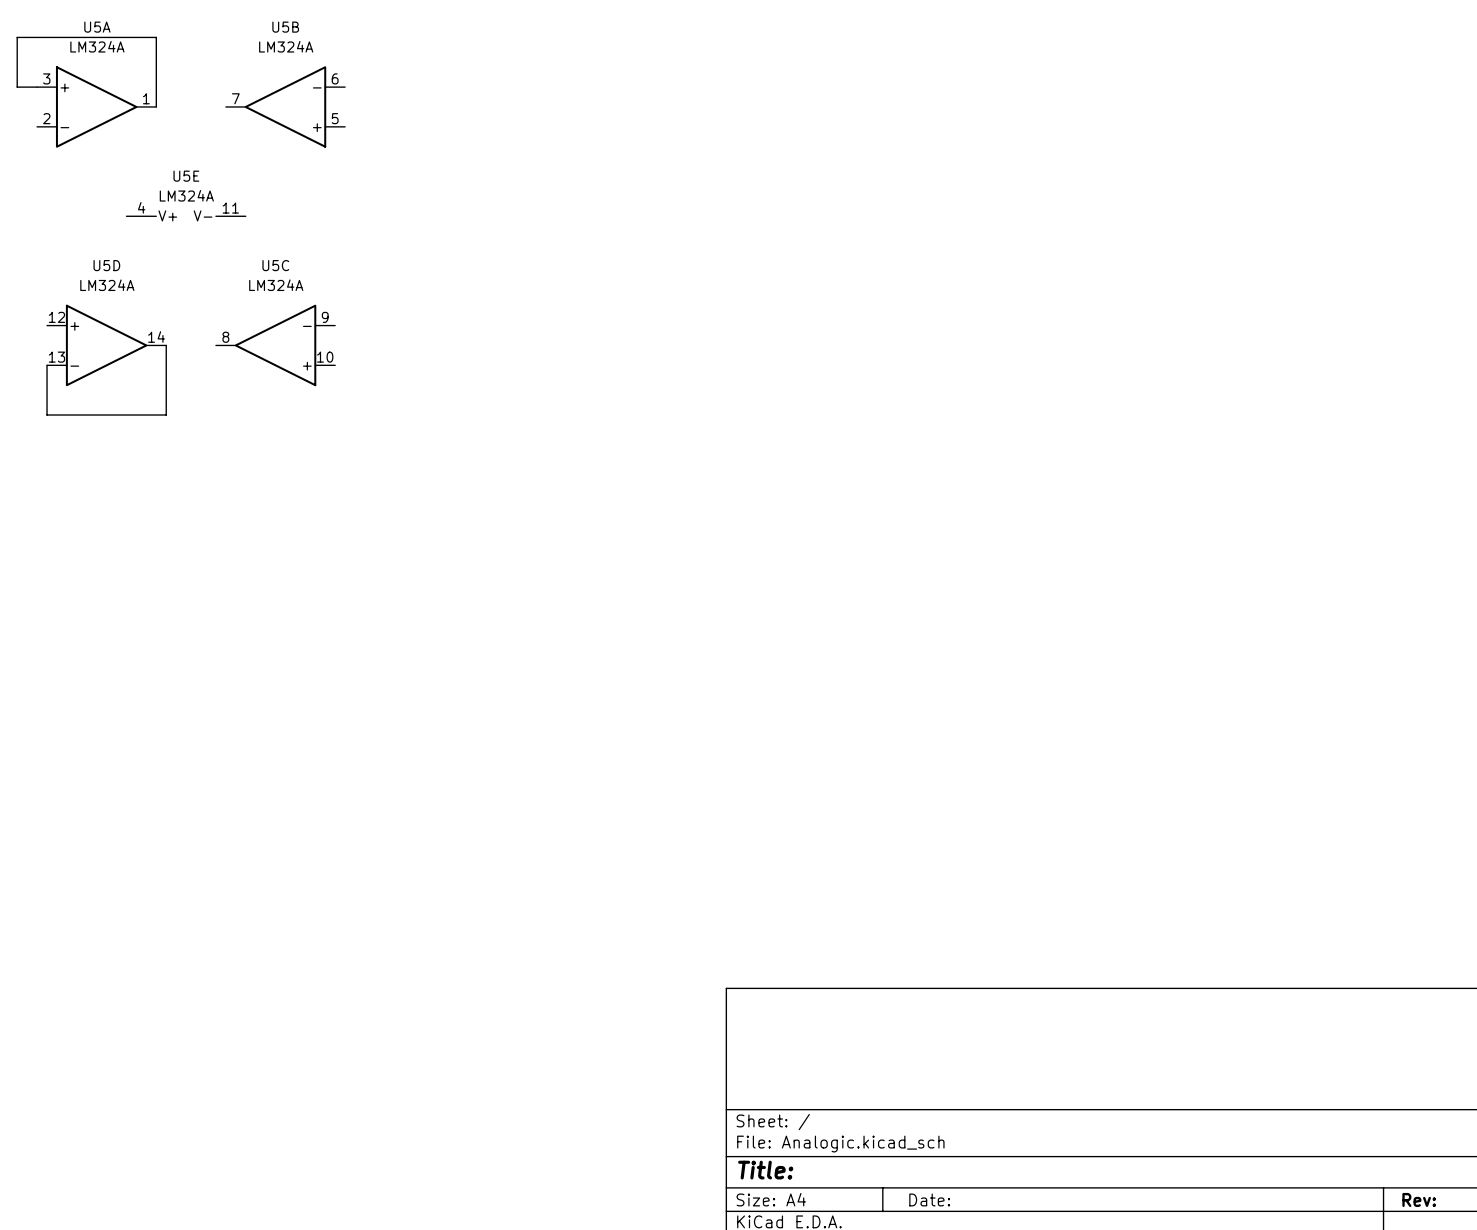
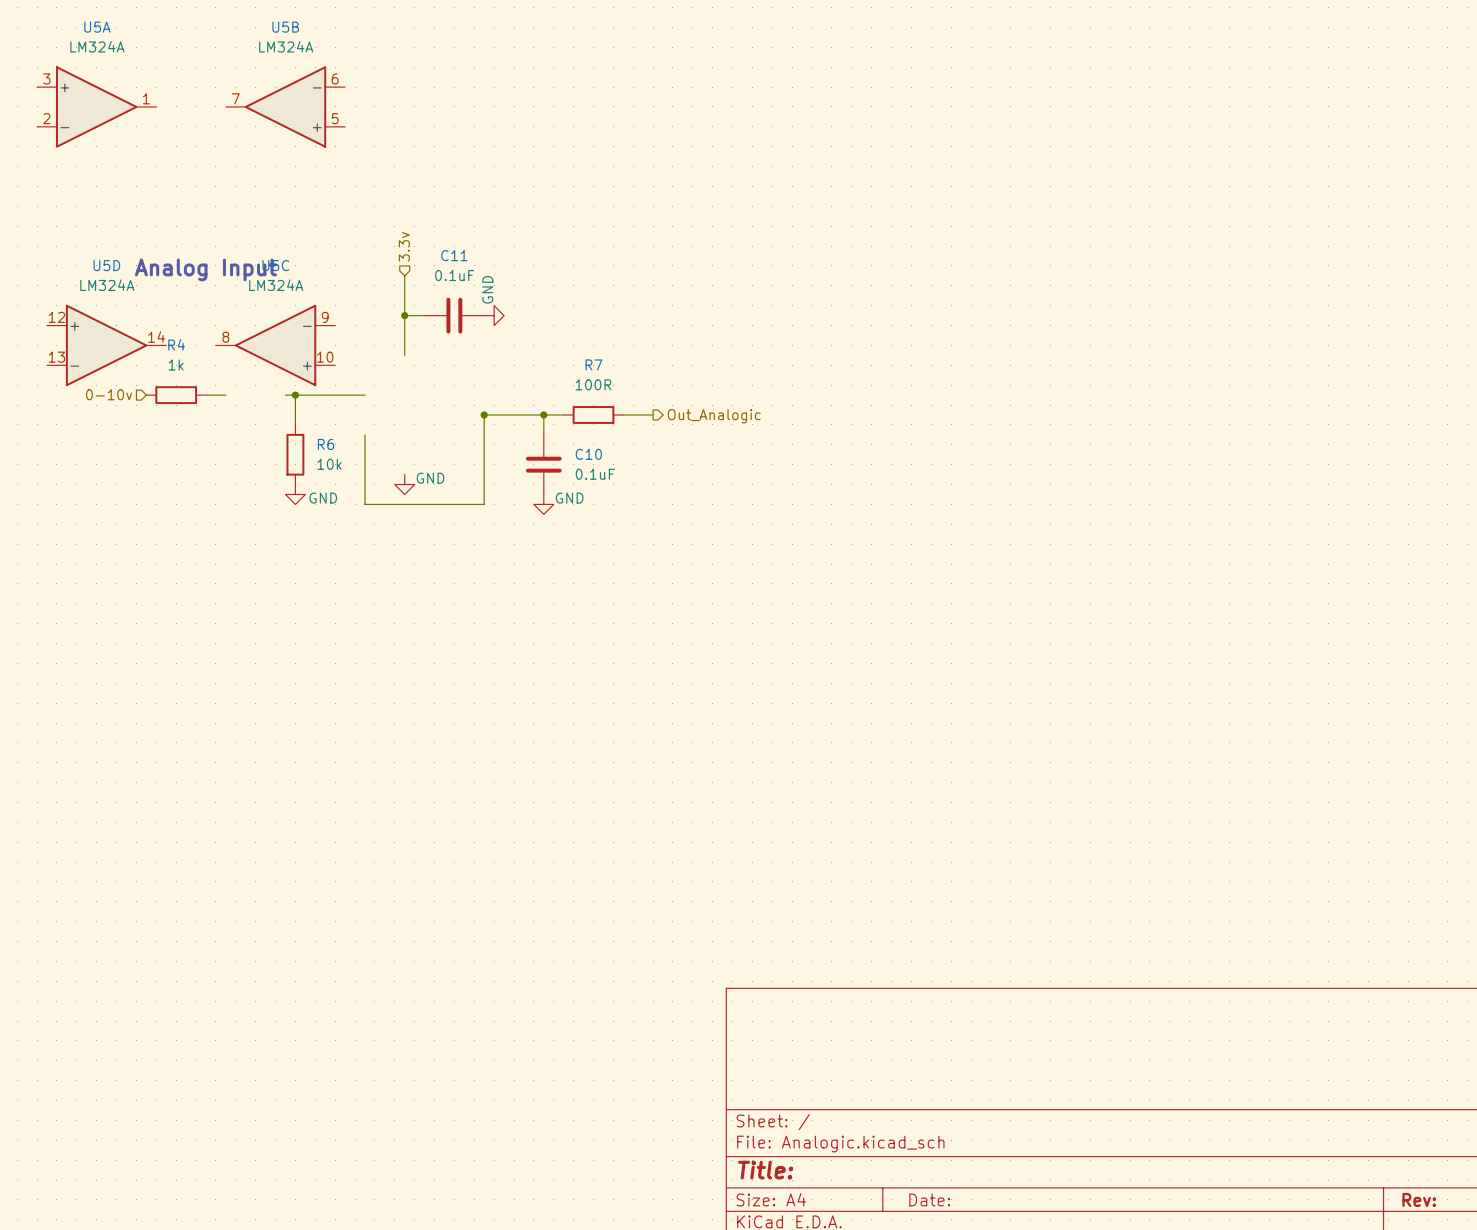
wire: (37, 87) (17, 87) (17, 37) (156, 37) (156, 106) -> none
U5E: LM324A (186, 216) -> none
hierarchical label: none -> 3.3v (404, 246)
text: none -> Analog Input (205, 269)
wire: none -> (404, 275) (404, 355)
wire: none -> (404, 315) (424, 315)
junction: none -> (404, 315)
C11: none -> 0.1uF (454, 315)
power symbol: none -> GND (494, 315)
wire: (166, 345) (166, 415) (47, 415) (47, 365) -> none
hierarchical label: none -> 0-10v (109, 394)
R4: none -> 1k (176, 395)
wire: none -> (205, 395) (225, 395)
wire: none -> (285, 395) (364, 395)
wire: none -> (295, 395) (295, 424)
junction: none -> (295, 395)
junction: none -> (484, 415)
wire: none -> (543, 415) (543, 434)
junction: none -> (543, 415)
wire: none -> (563, 415) (484, 415) (484, 504) (364, 504) (364, 434)
R7: none -> 100R (593, 415)
wire: none -> (623, 415) (653, 415)
hierarchical label: none -> Out_Analogic (714, 416)
R6: none -> 10k (295, 454)
C10: none -> 0.1uF (543, 464)
power symbol: none -> GND (404, 484)
power symbol: none -> GND (295, 494)
power symbol: none -> GND (543, 504)

